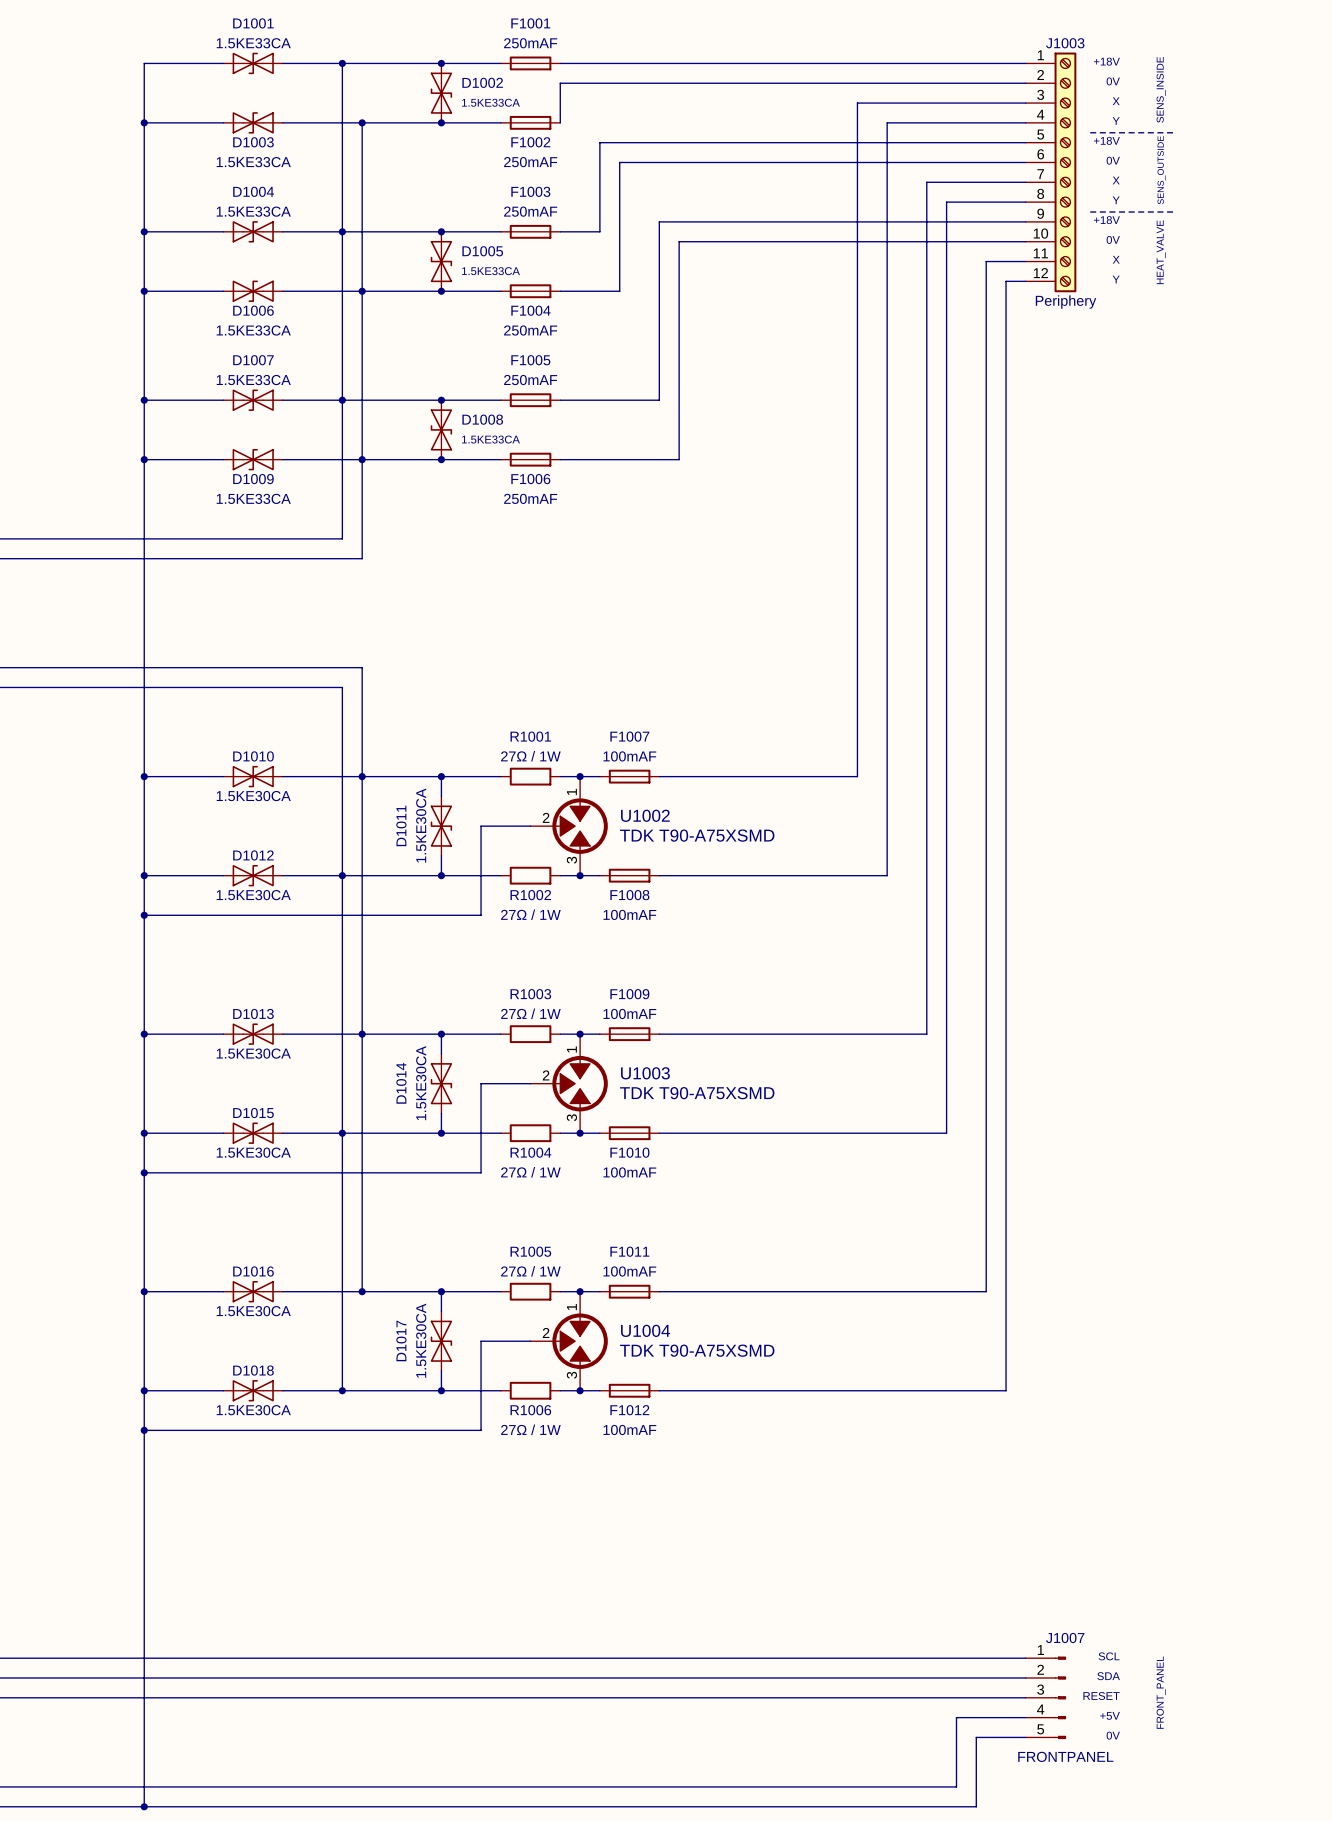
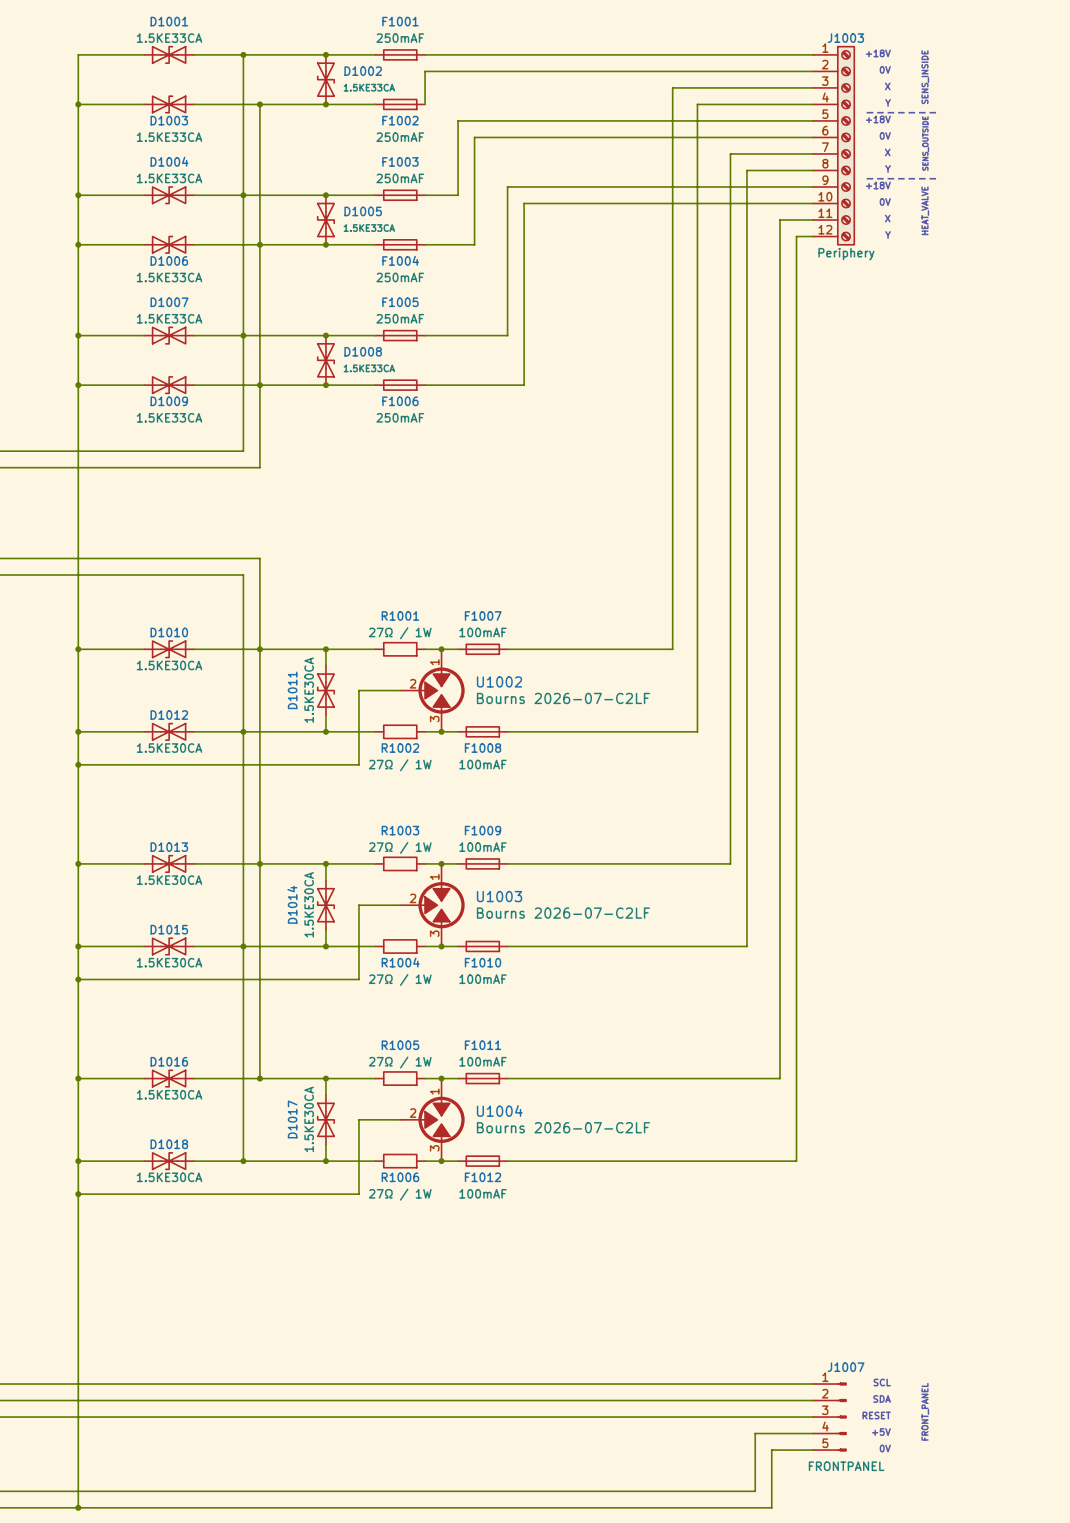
U1002 value: TDK T90-A75XSMD (697, 835) -> Bourns 2026-07-C2LF (563, 698)
U1003 value: TDK T90-A75XSMD (697, 1093) -> Bourns 2026-07-C2LF (563, 913)
U1004 value: TDK T90-A75XSMD (697, 1350) -> Bourns 2026-07-C2LF (563, 1127)

